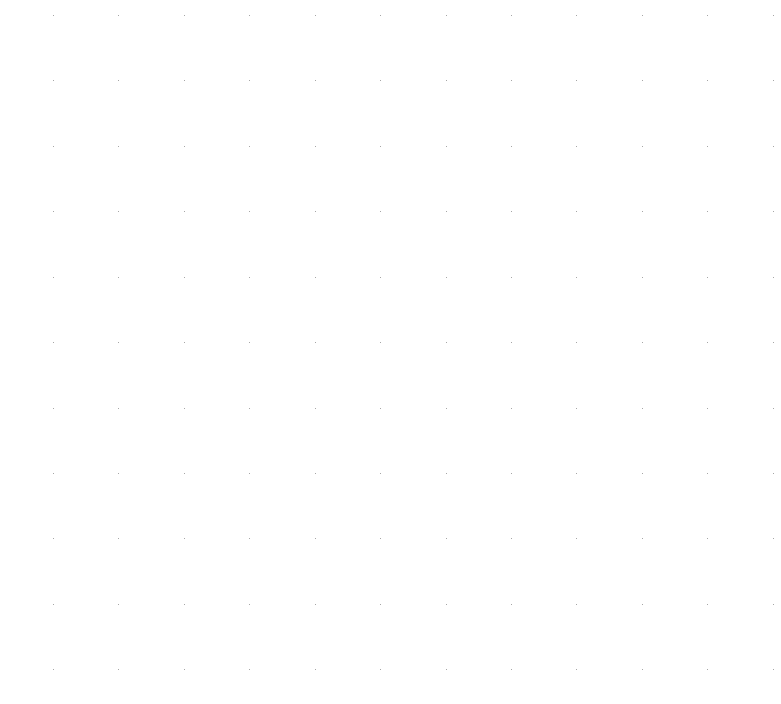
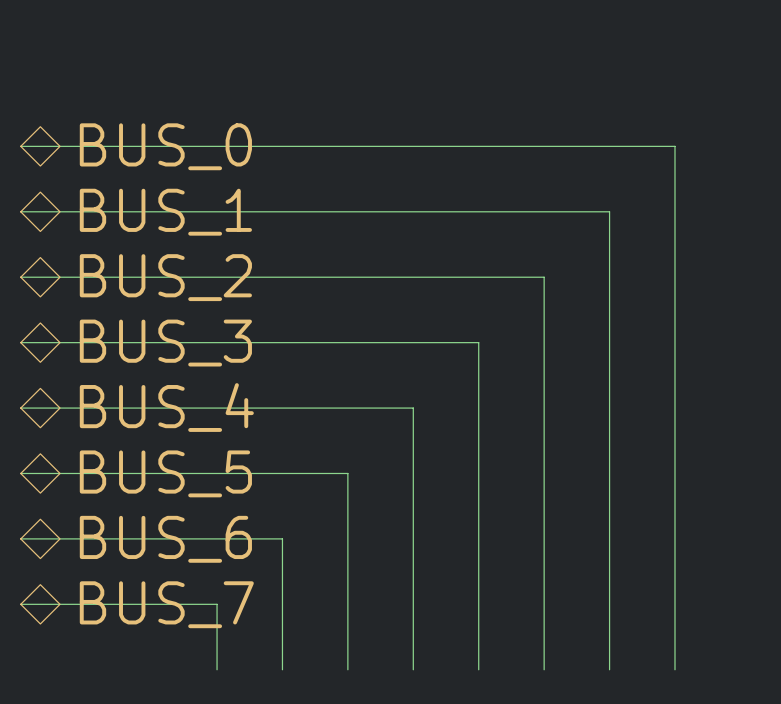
wire: none -> (20, 146) (674, 146) (674, 669)
hierarchical label: none -> BUS_0 (165, 146)
wire: none -> (20, 211) (609, 211) (609, 669)
hierarchical label: none -> BUS_1 (165, 212)
wire: none -> (20, 277) (544, 277) (544, 669)
hierarchical label: none -> BUS_2 (165, 277)
wire: none -> (20, 342) (478, 342) (478, 669)
hierarchical label: none -> BUS_3 (165, 343)
hierarchical label: none -> BUS_4 (166, 407)
wire: none -> (20, 408) (413, 408) (413, 669)
wire: none -> (20, 473) (347, 473) (347, 669)
hierarchical label: none -> BUS_5 (165, 473)
wire: none -> (20, 538) (282, 538) (282, 669)
hierarchical label: none -> BUS_6 (165, 539)
wire: none -> (20, 604) (217, 604) (217, 669)
hierarchical label: none -> BUS_7 (166, 604)

